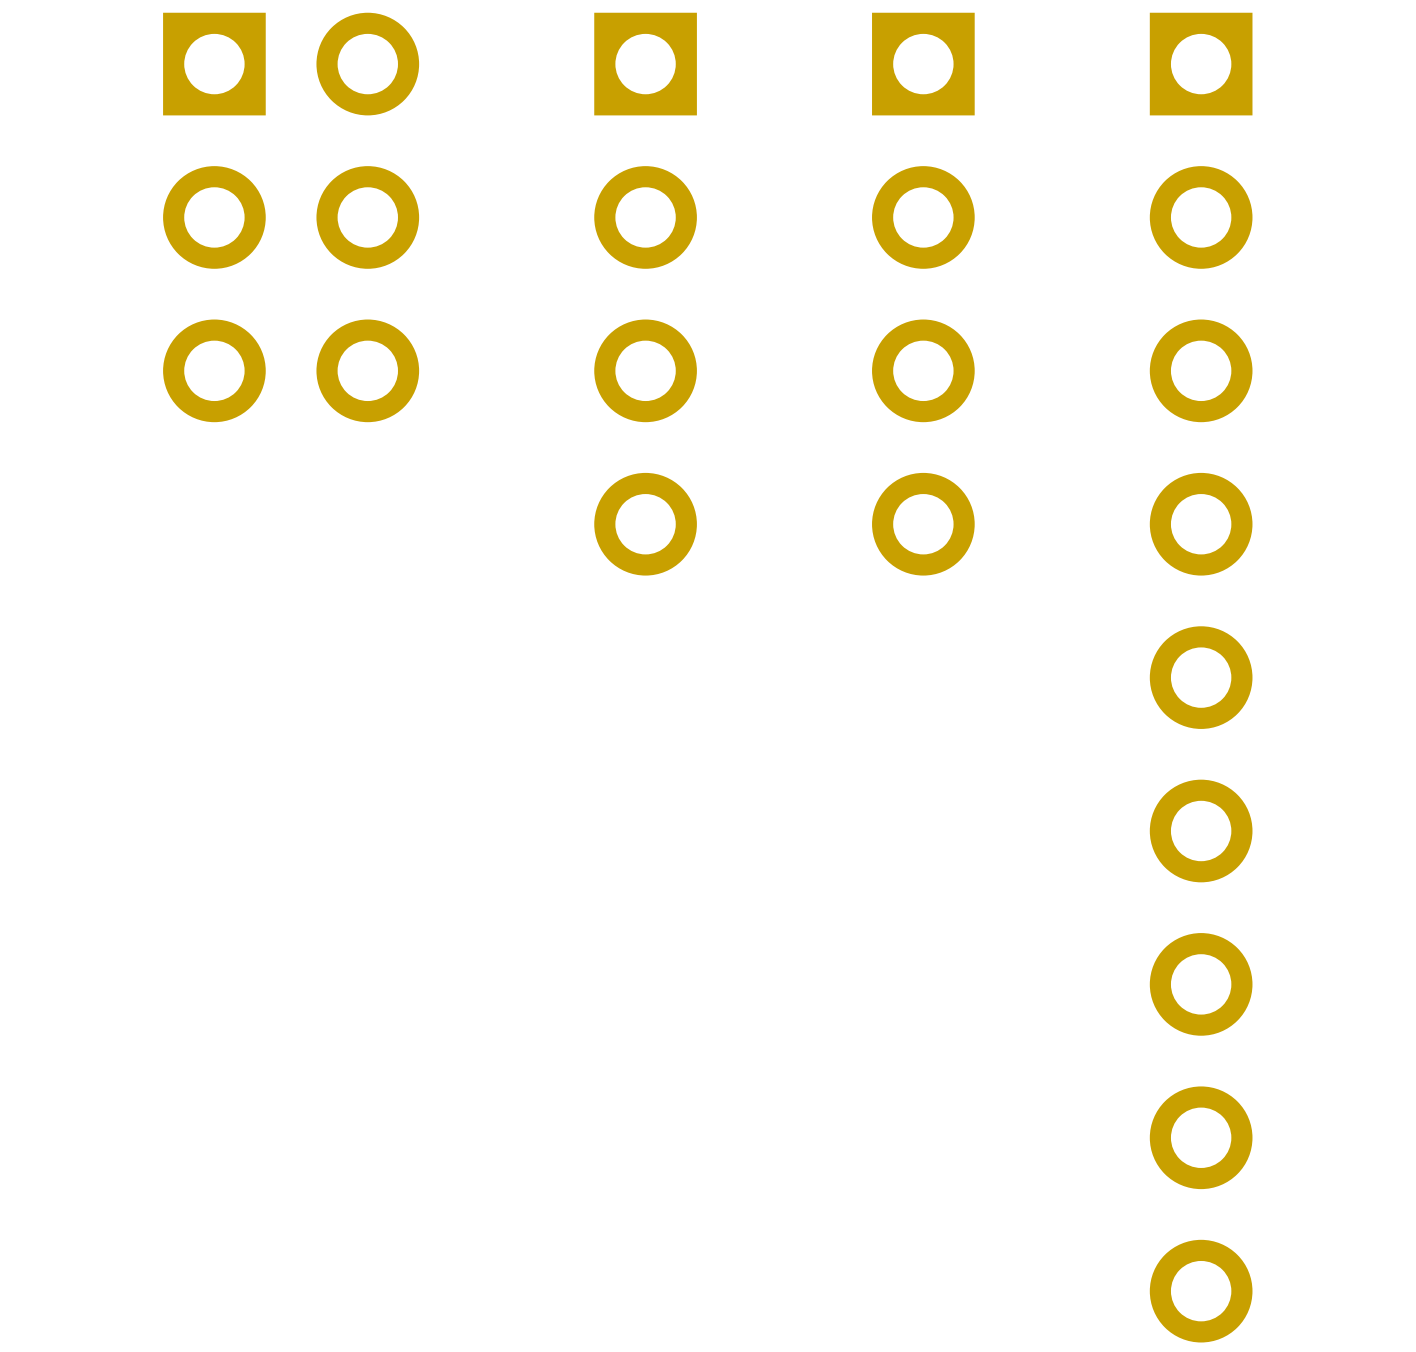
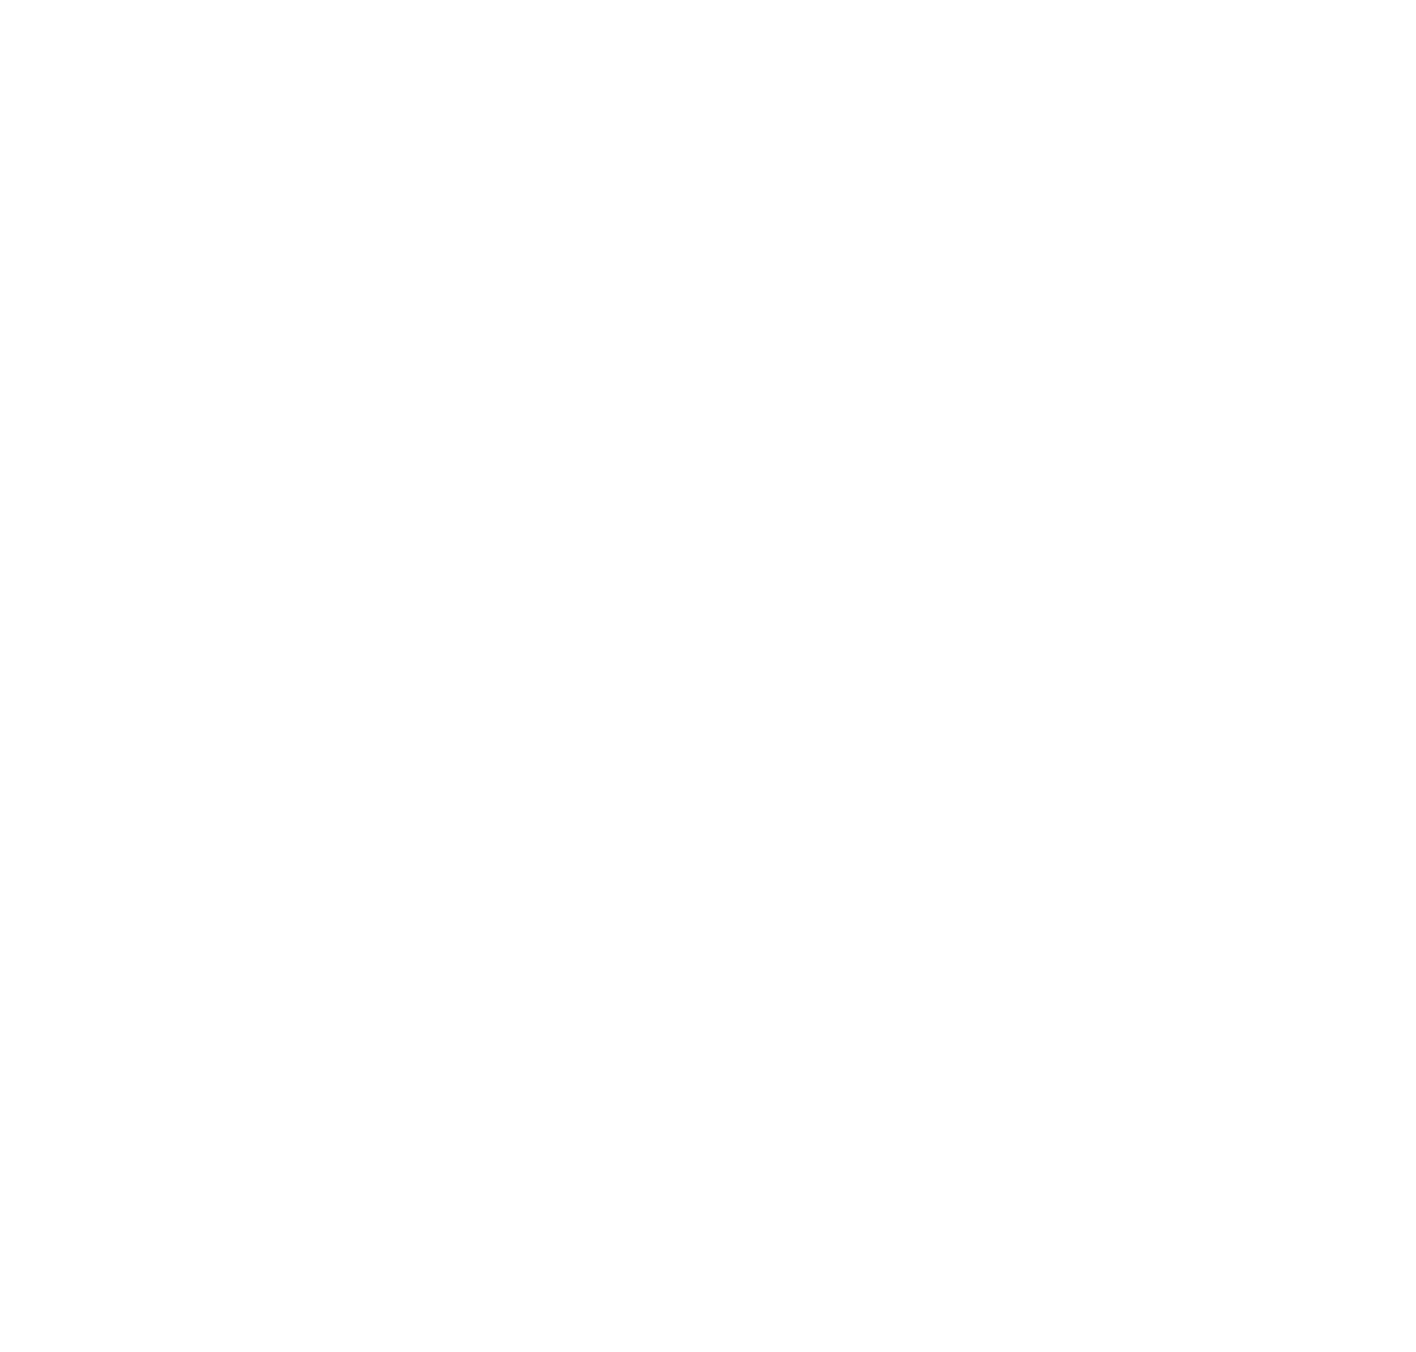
part: (291, 217) -> none
part: (645, 294) -> none
part: (923, 294) -> none
part: (1201, 677) -> none

